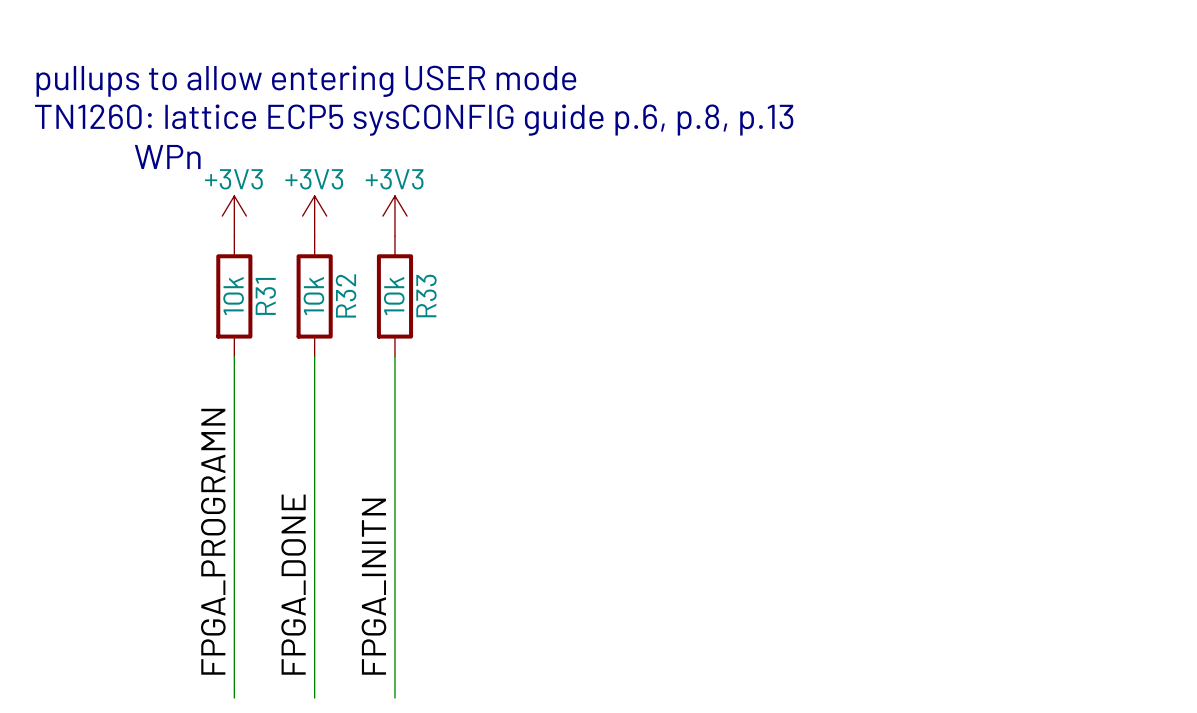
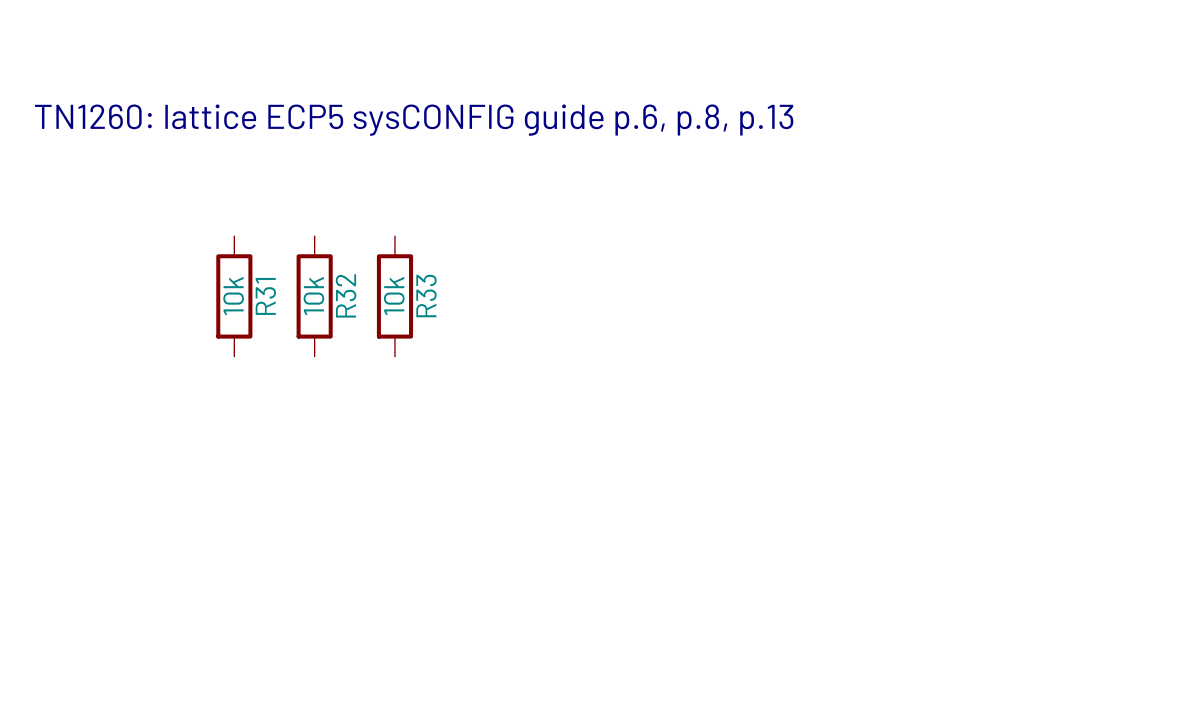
text: pullups to allow entering USER mode (306, 81) -> none
text: WPn (167, 156) -> none
power symbol: +3V3 (234, 216) -> none
power symbol: +3V3 (314, 216) -> none
power symbol: +3V3 (394, 216) -> none
wire: (234, 356) (234, 698) -> none
wire: (314, 356) (314, 698) -> none
wire: (394, 356) (394, 698) -> none
label: FPGA_PROGRAMN (213, 541) -> none
label: FPGA_DONE (293, 584) -> none
label: FPGA_INITN (373, 586) -> none

